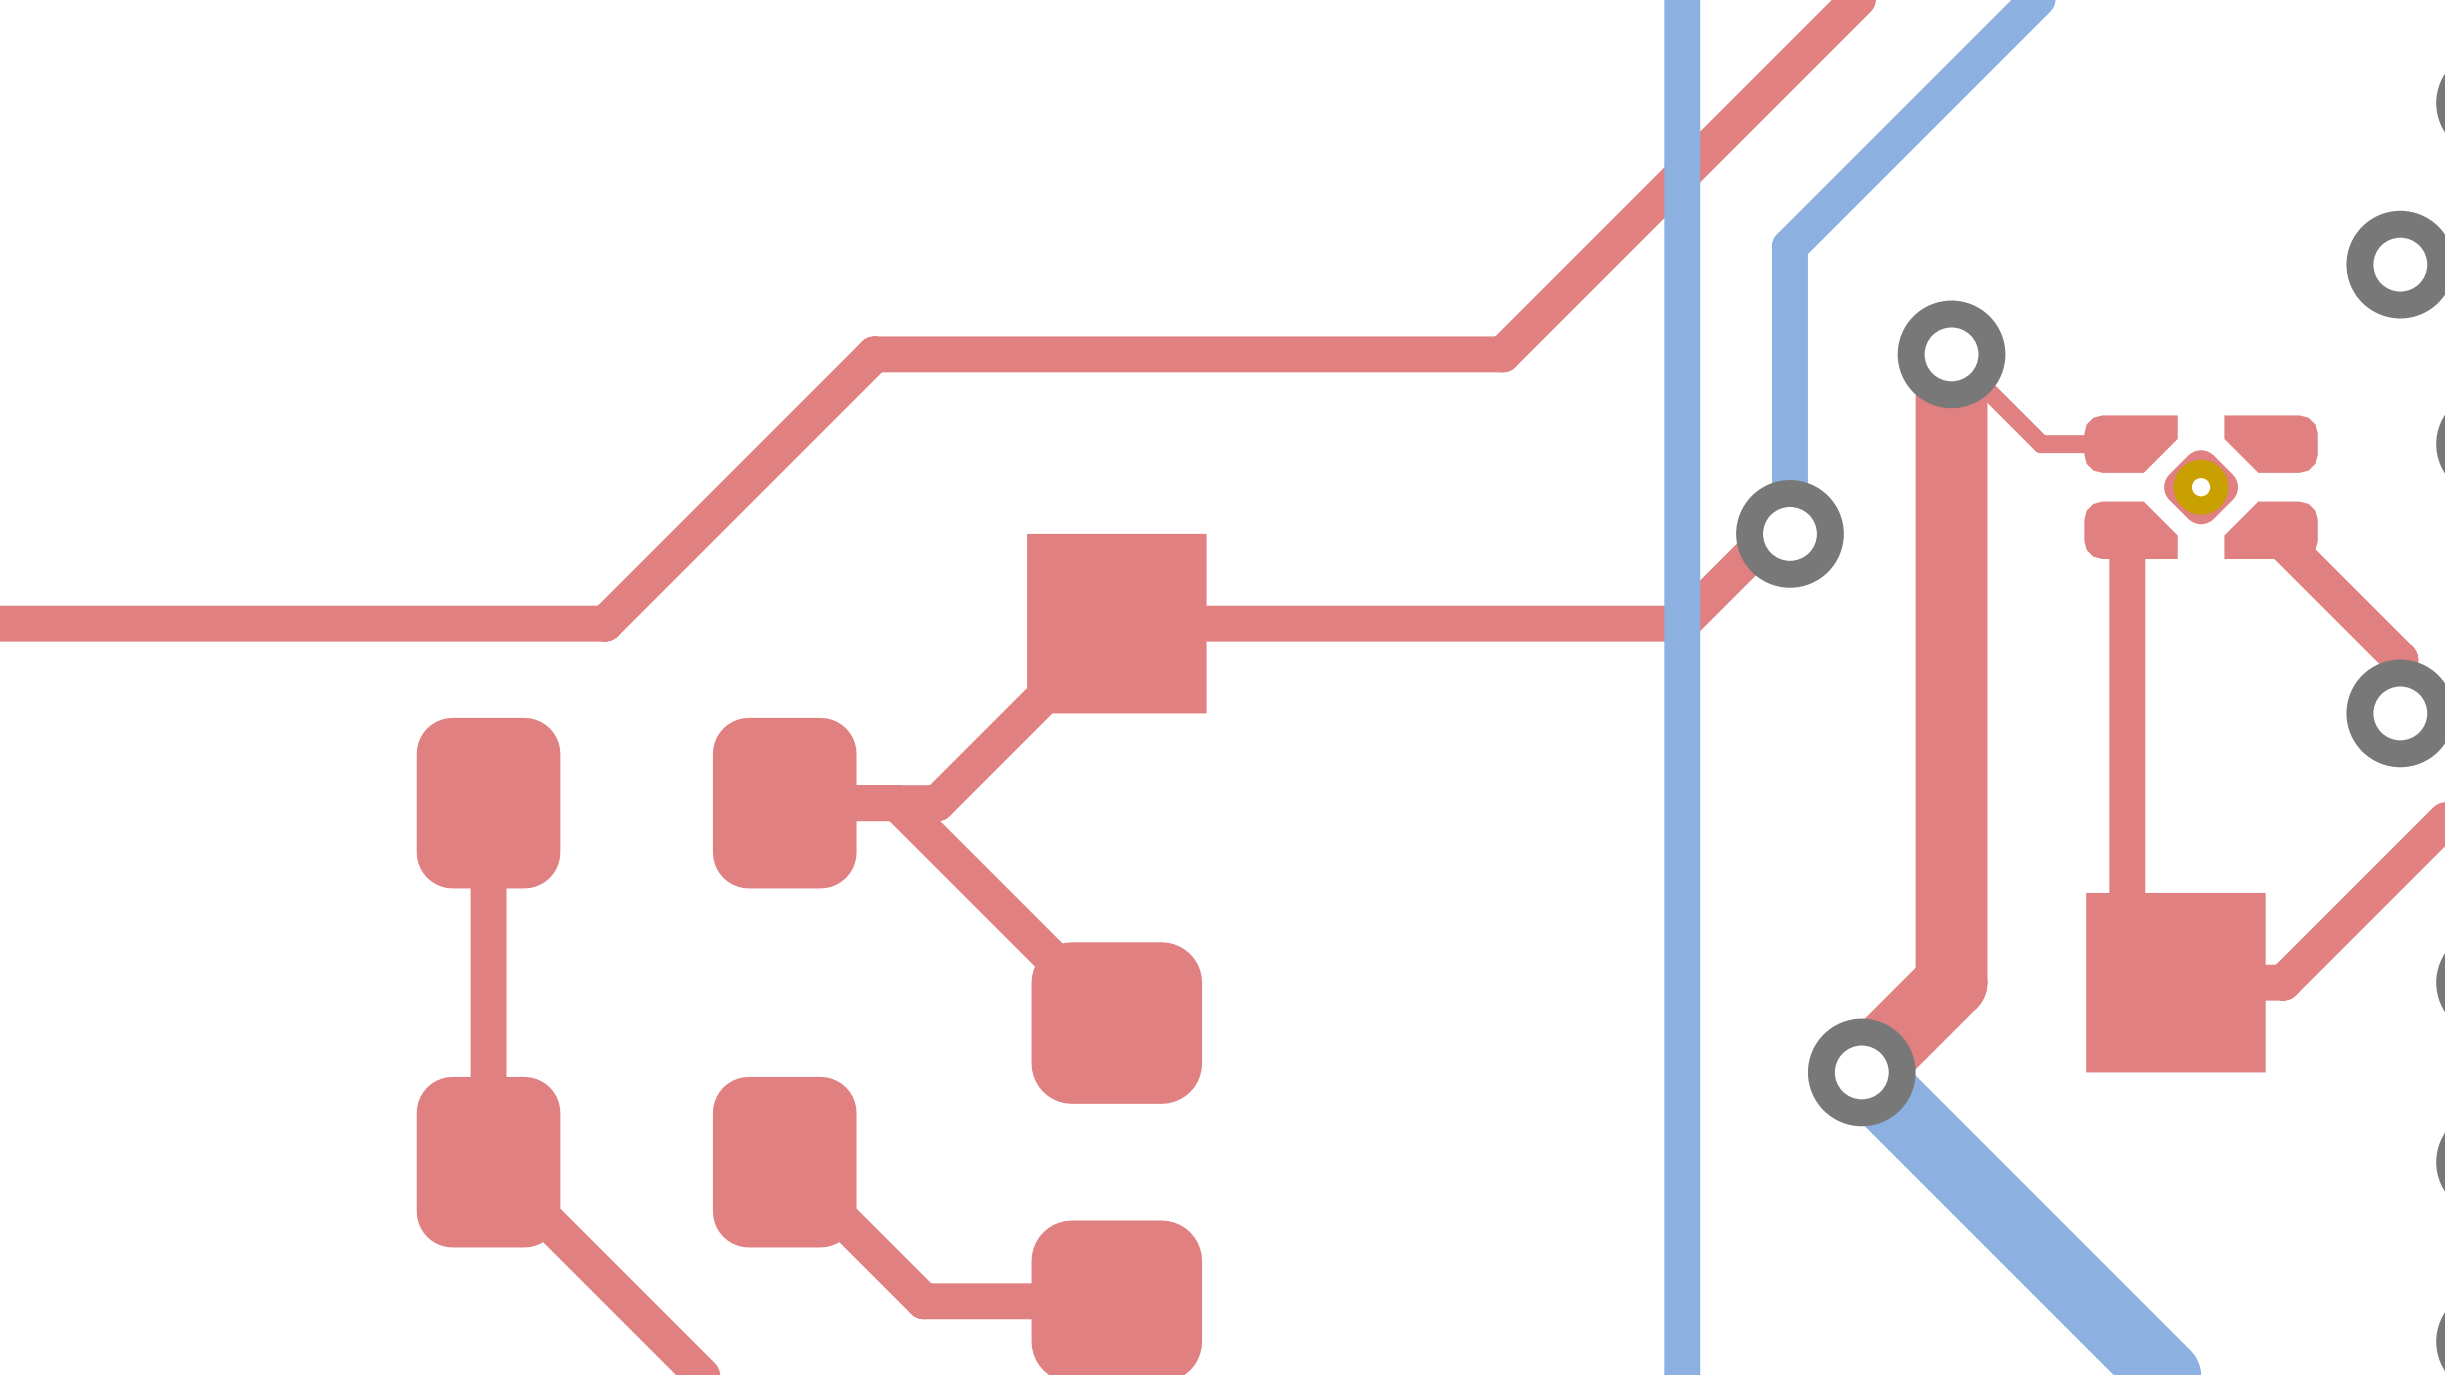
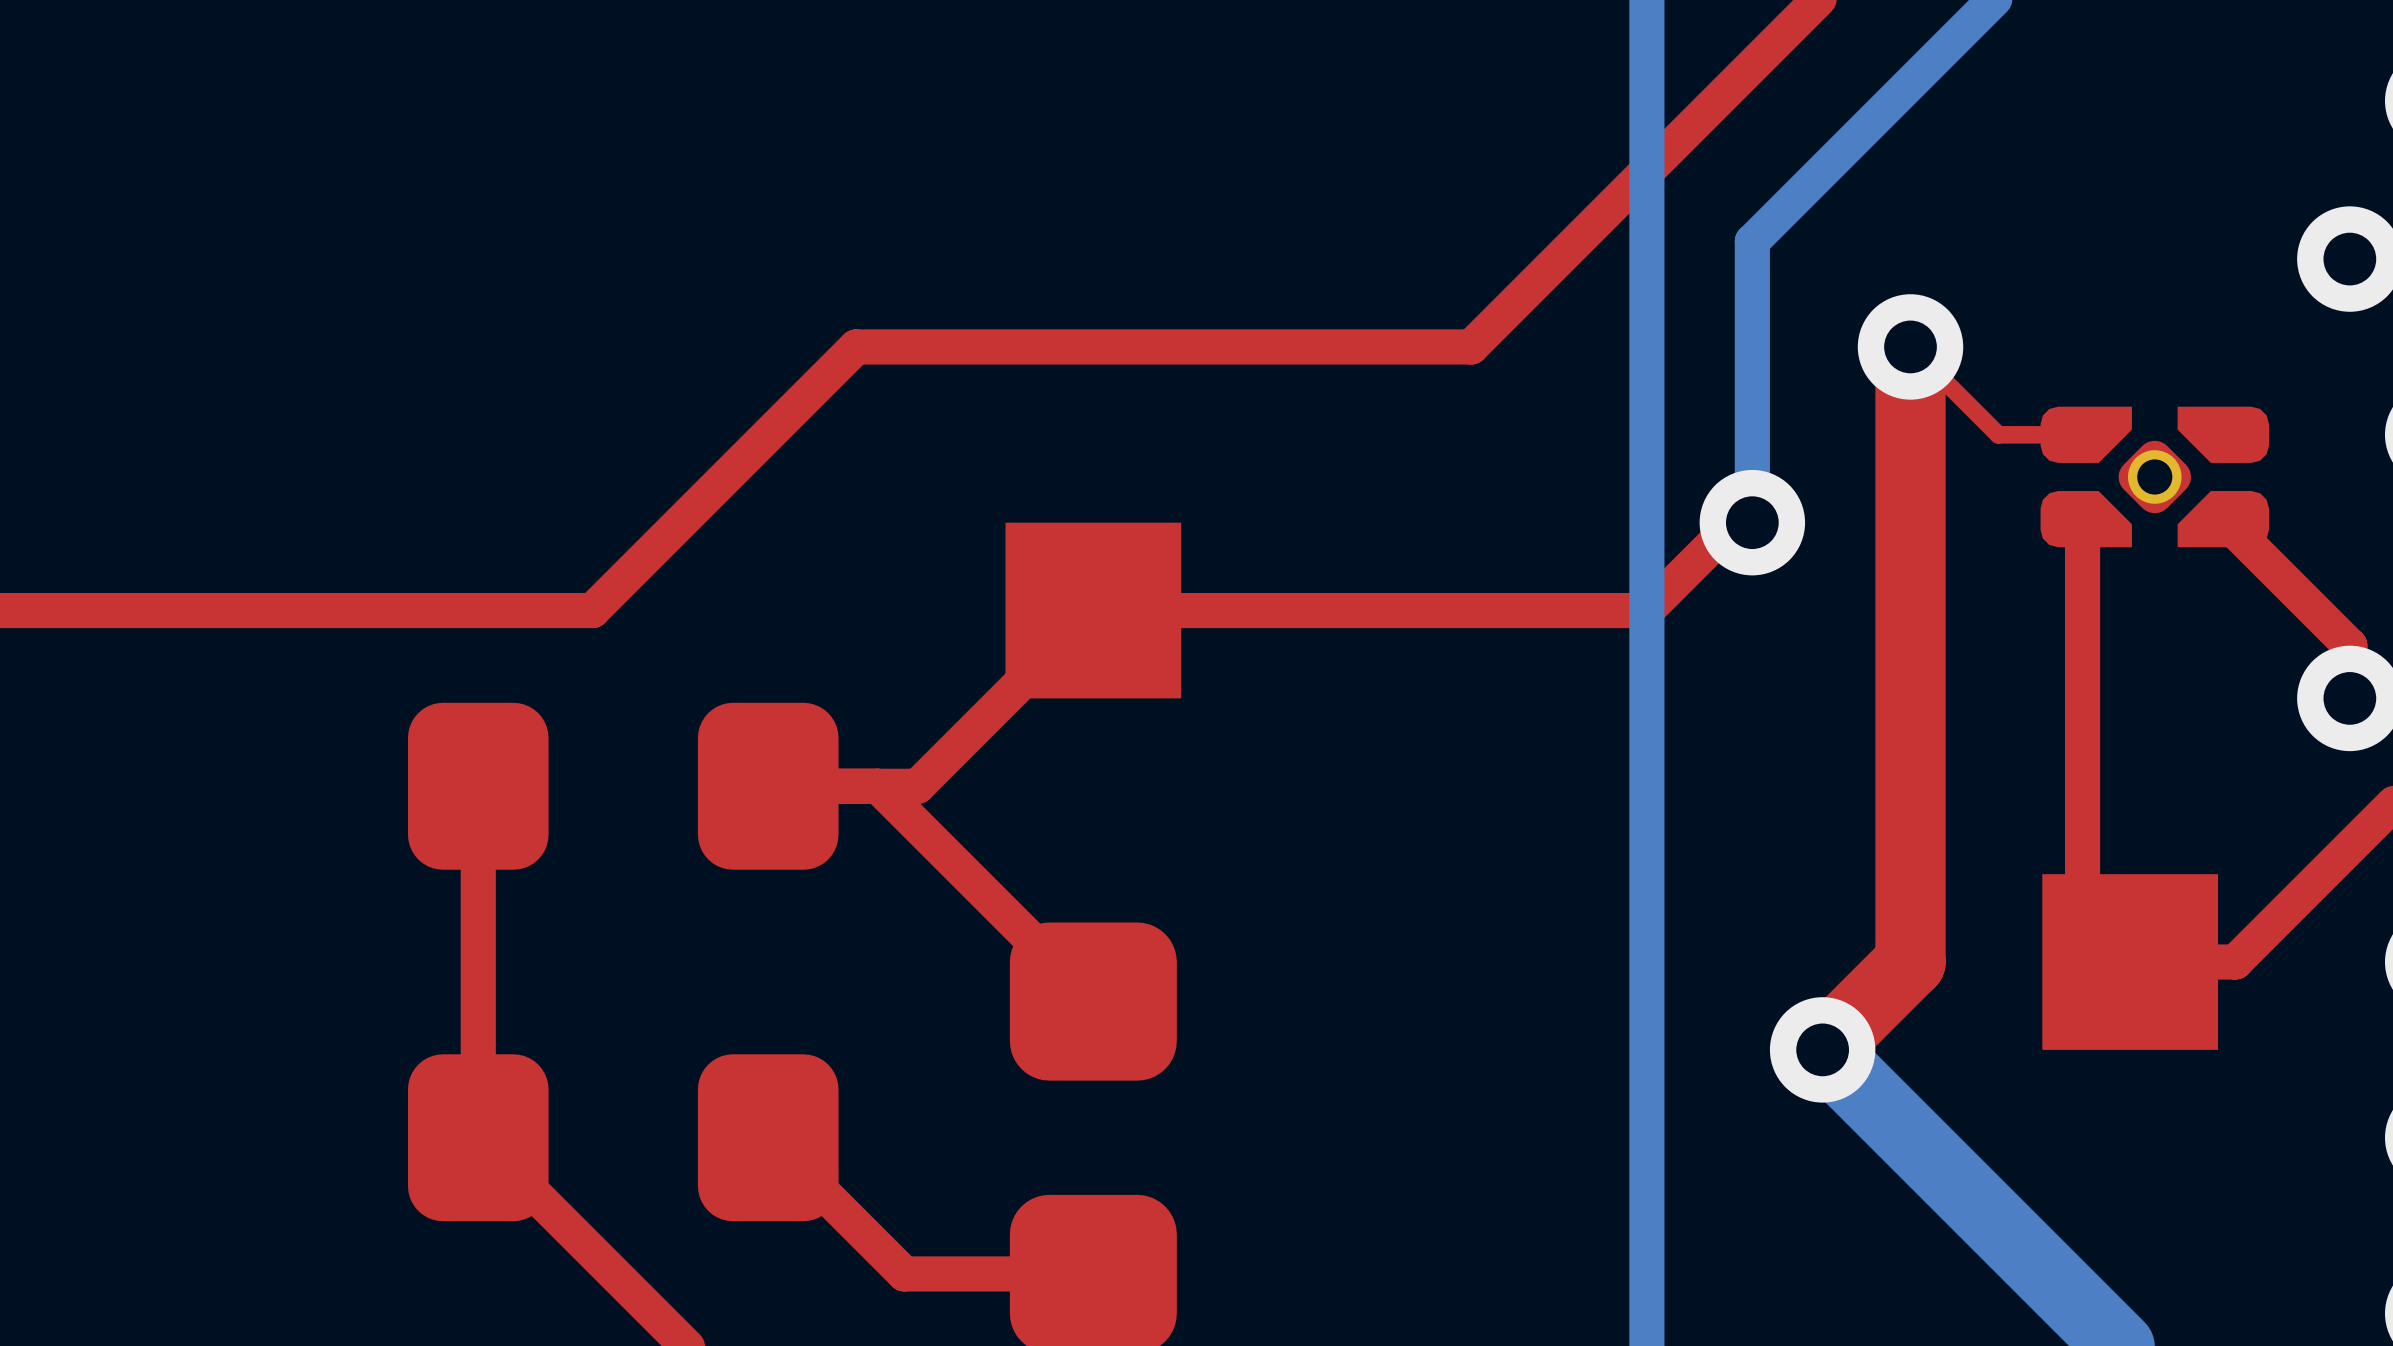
part footprint: [2084, 415, 2318, 560] -> [2040, 406, 2270, 548]

